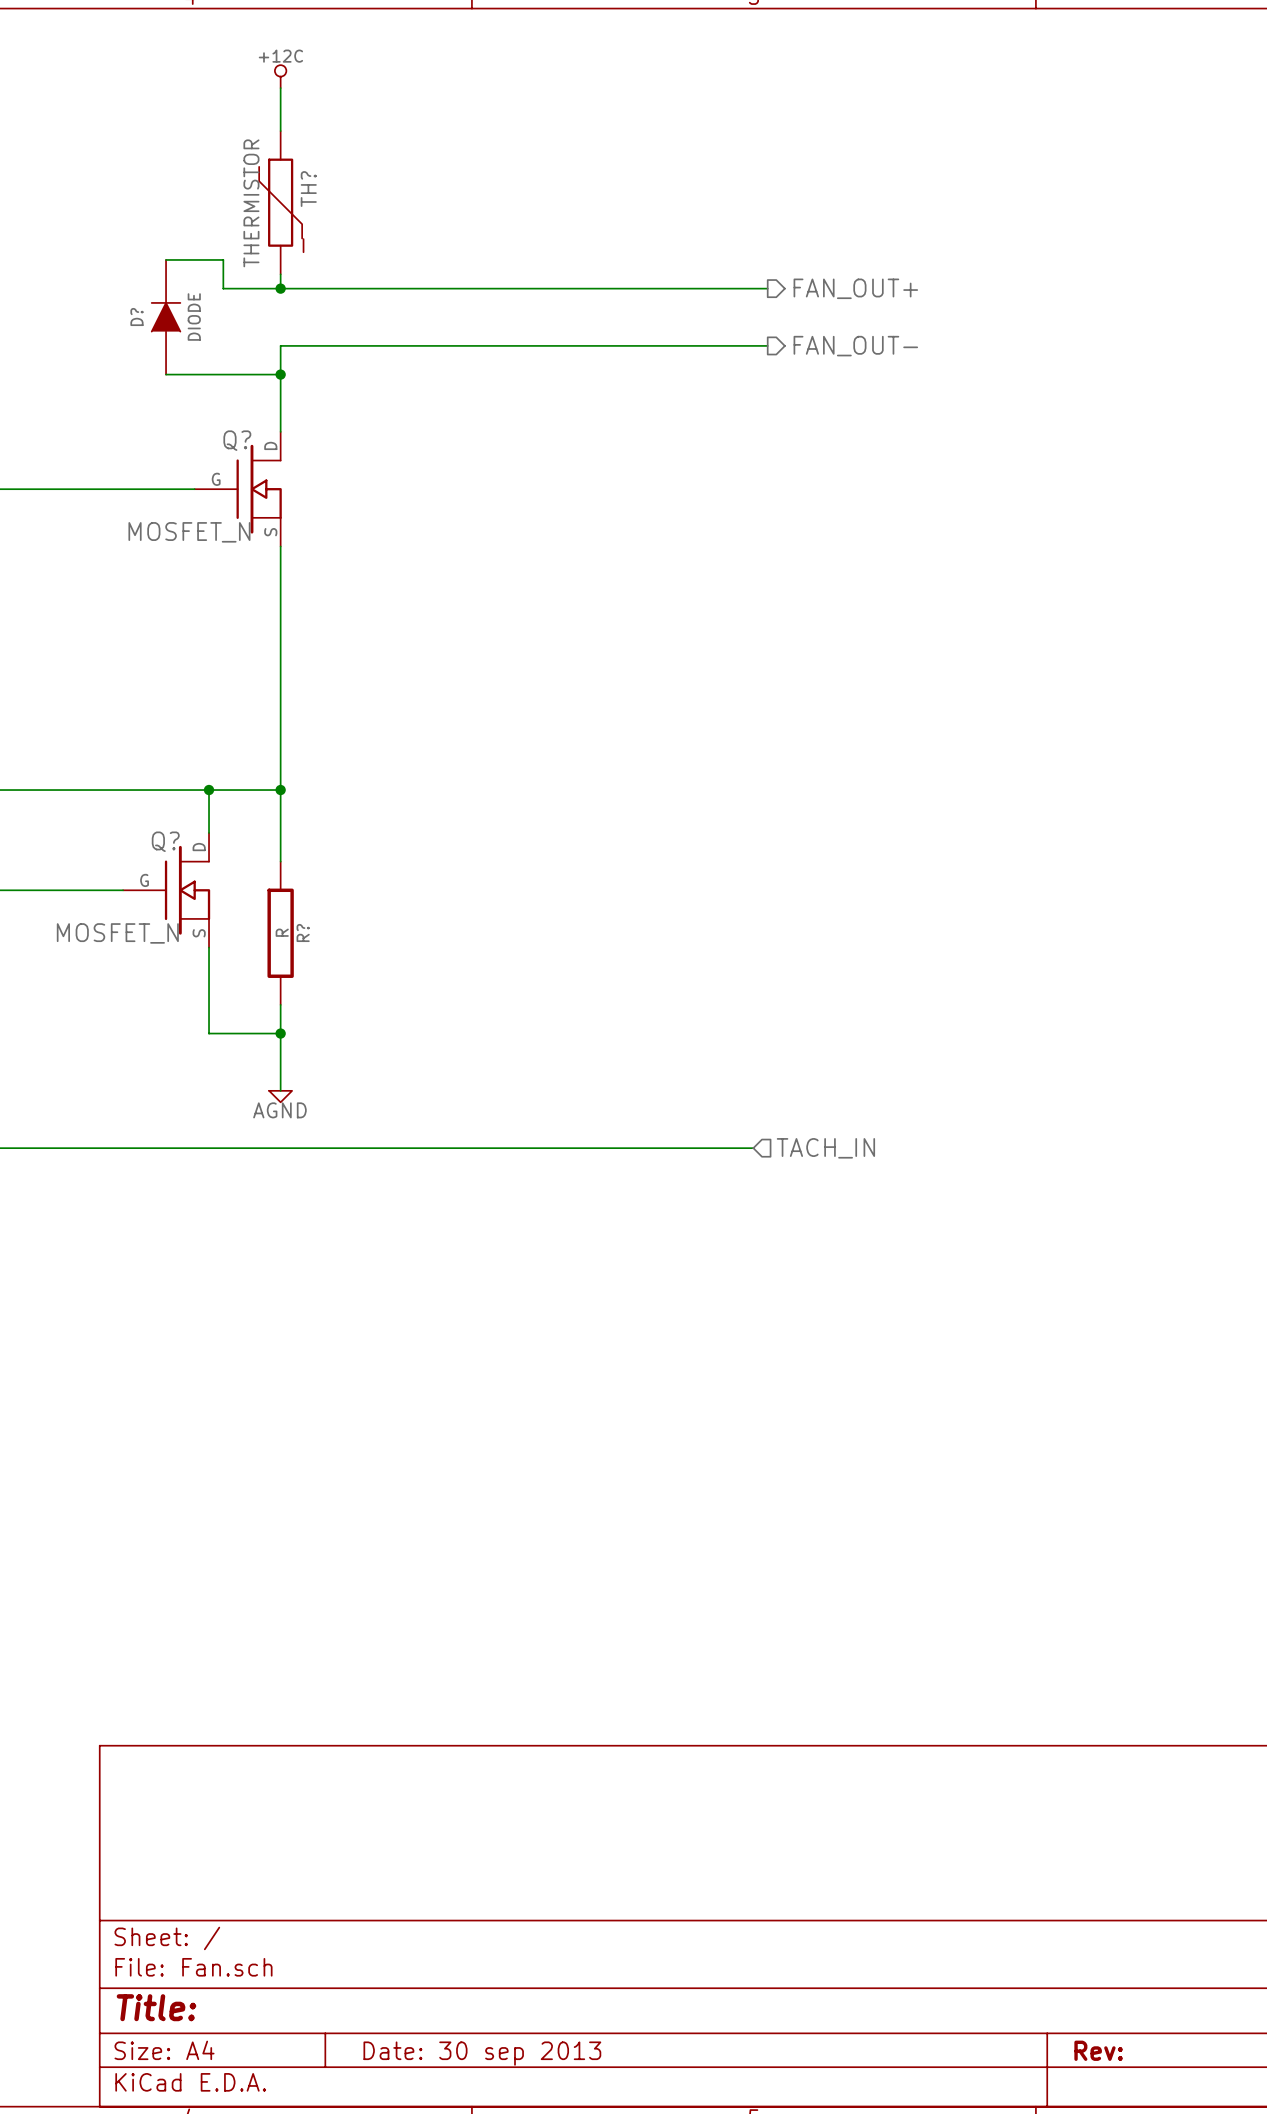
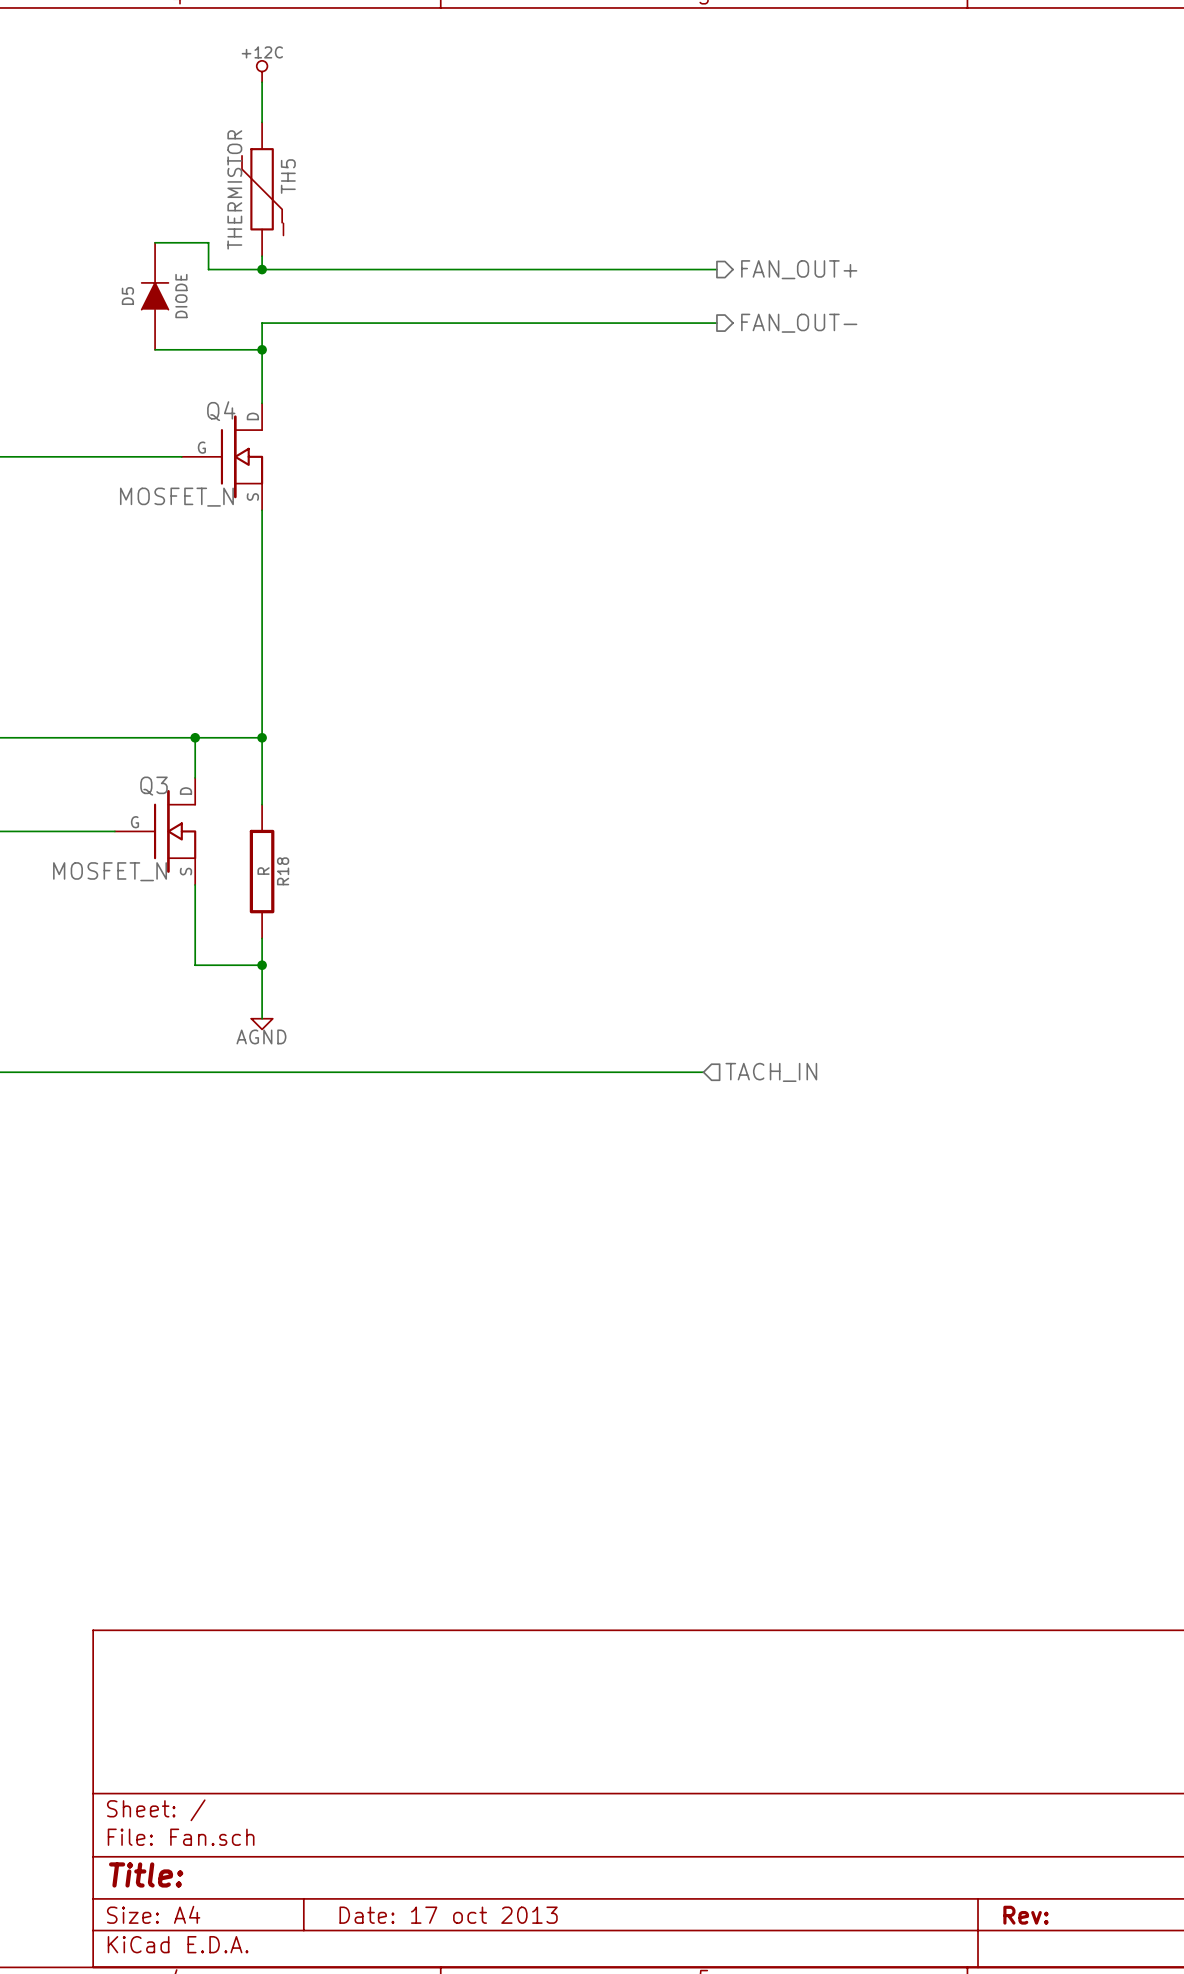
TH? name: TH? (308, 189) -> TH5 (288, 176)
D? name: D? (136, 317) -> D5 (127, 296)
Q? name: Q? (237, 440) -> Q4 (221, 411)
Q? name: Q? (165, 841) -> Q3 (154, 786)
R? name: R? (303, 932) -> R18 (283, 871)
title block: Date: 30 sep 2013 (482, 2053) -> Date: 17 oct 2013 (448, 1915)

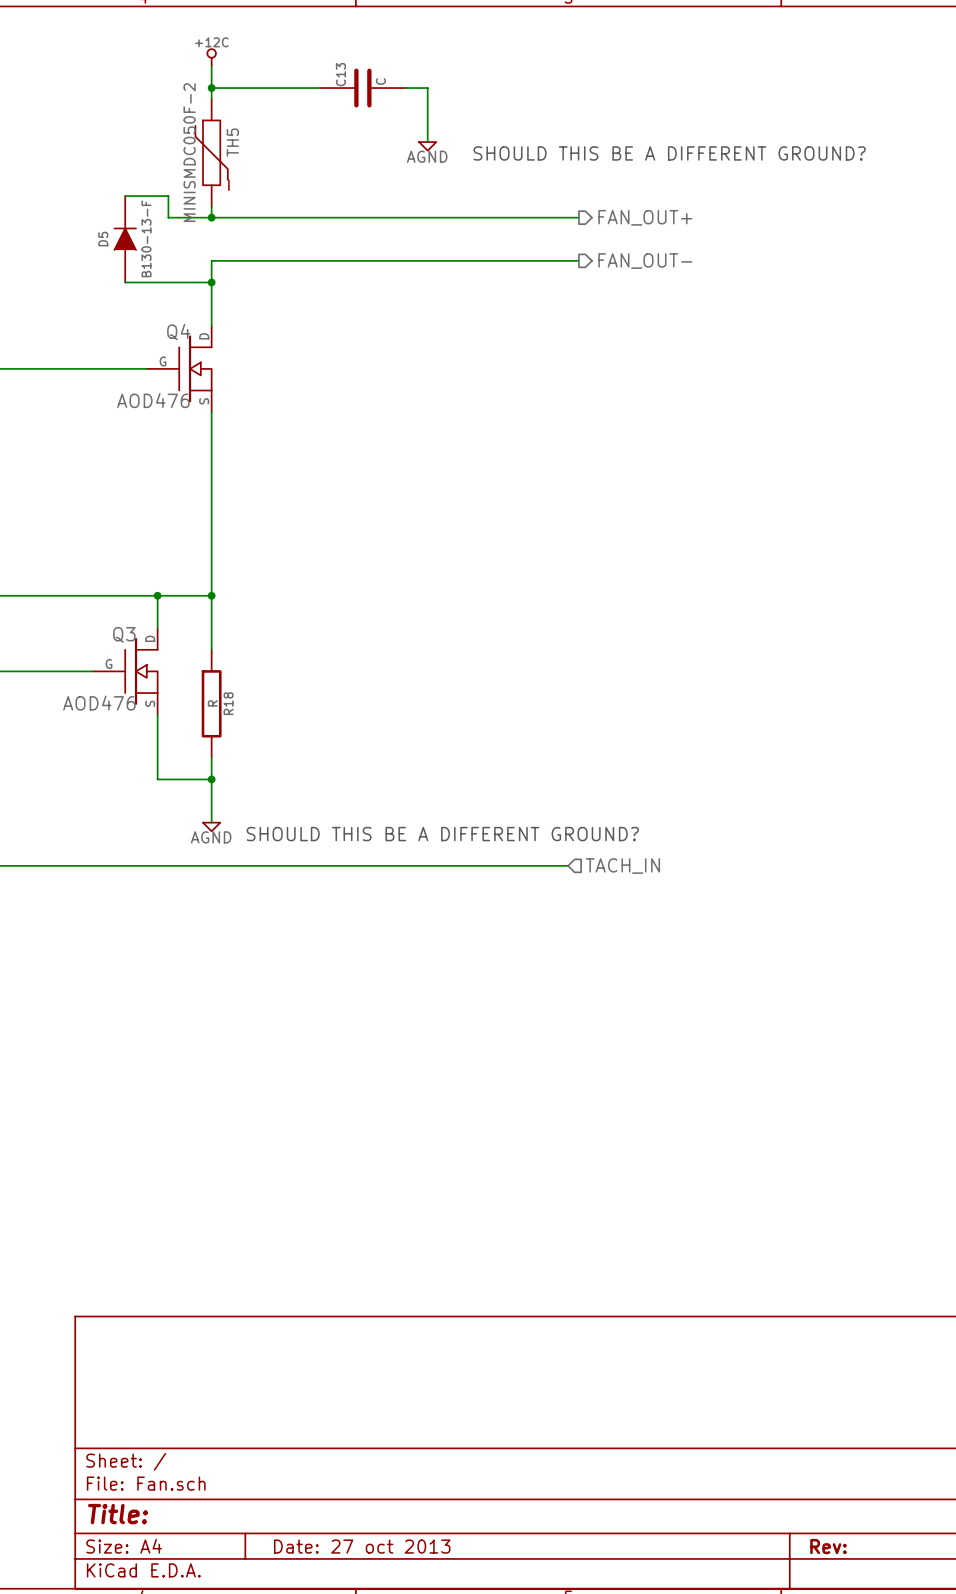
wire: none -> (211, 88) (319, 88)
junction: none -> (211, 88)
C13: none -> C (362, 88)
wire: none -> (406, 88) (427, 88) (427, 142)
power symbol: none -> AGND (427, 146)
TH5 value: THERMISTOR (234, 189) -> MINISMDC050F-2 (189, 152)
text: none -> SHOULD THIS BE A DIFFERENT GROUND? (669, 153)
D5 value: DIODE (181, 296) -> B130-13-F (146, 238)
Q4 value: MOSFET_N (176, 497) -> AOD476 (153, 400)
Q3 value: MOSFET_N (110, 871) -> AOD476 (99, 703)
text: none -> SHOULD THIS BE A DIFFERENT GROUND? (442, 834)
title block: Date: 17 oct 2013 (448, 1915) -> Date: 27 oct 2013 (362, 1546)

